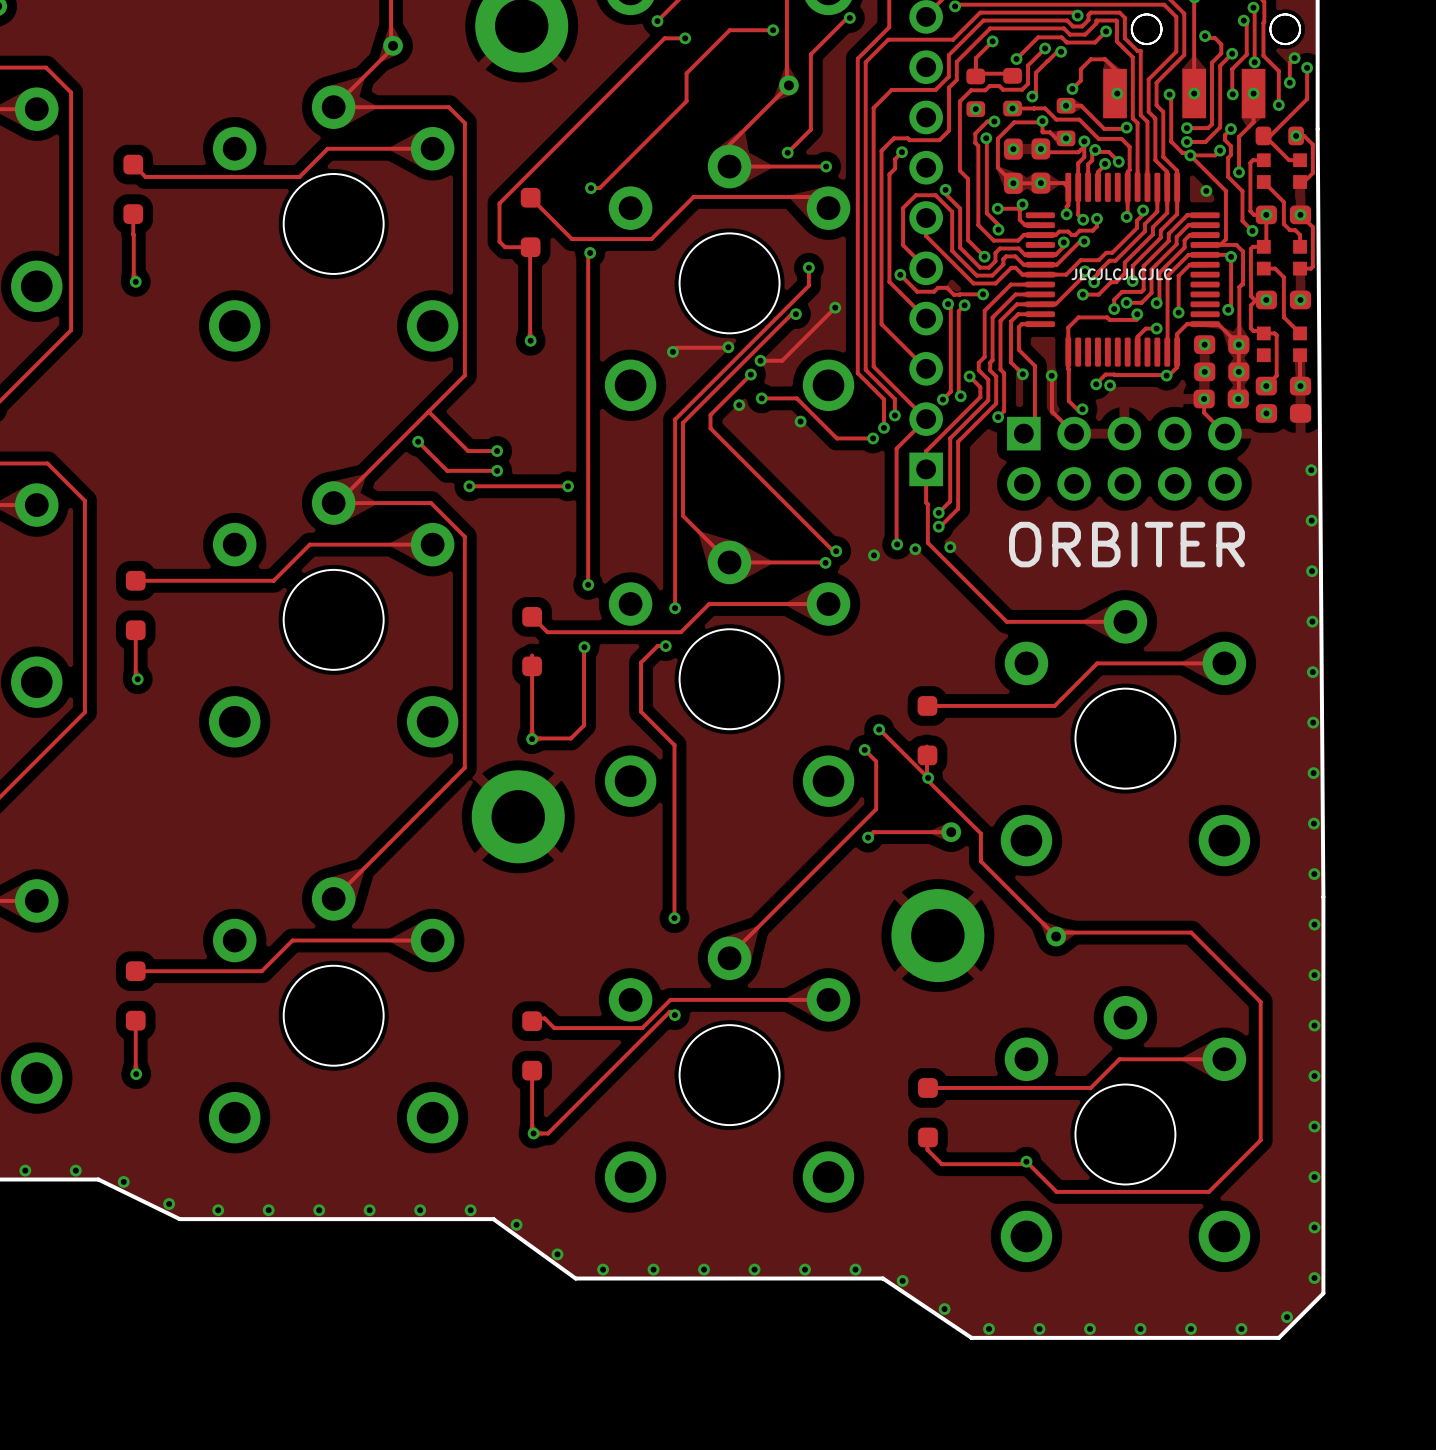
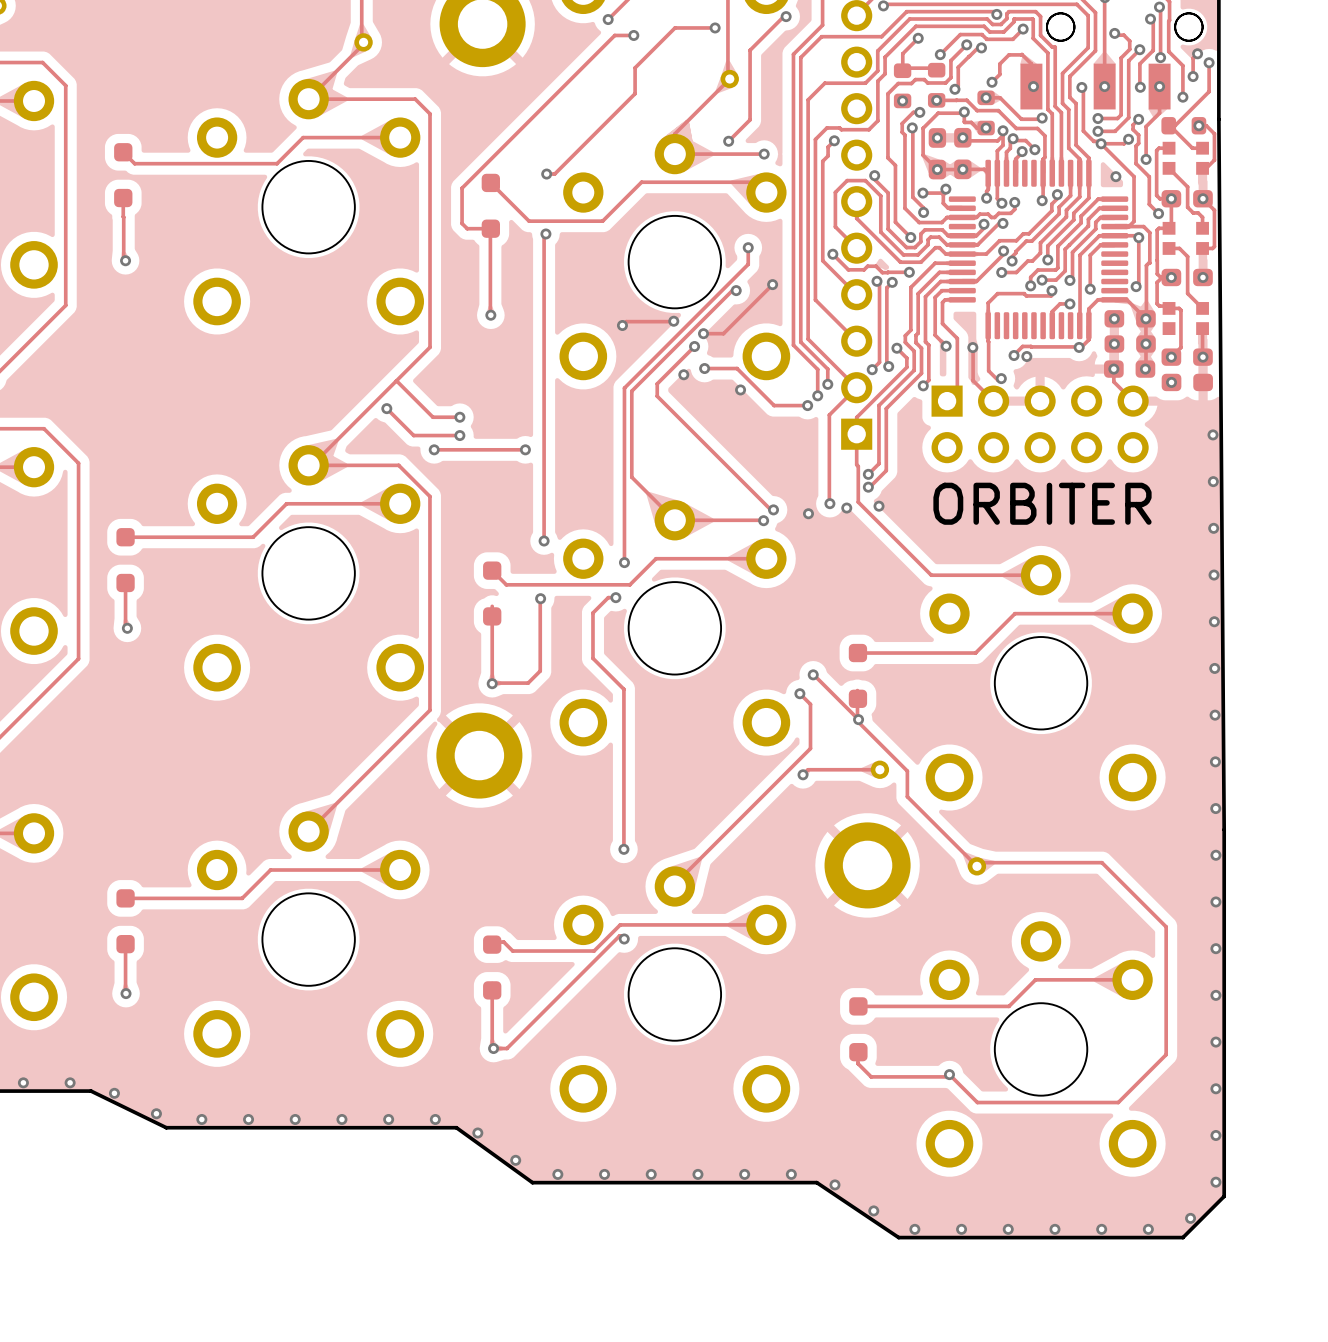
text: JLCJLCJLCJLC (1121, 274) -> none

